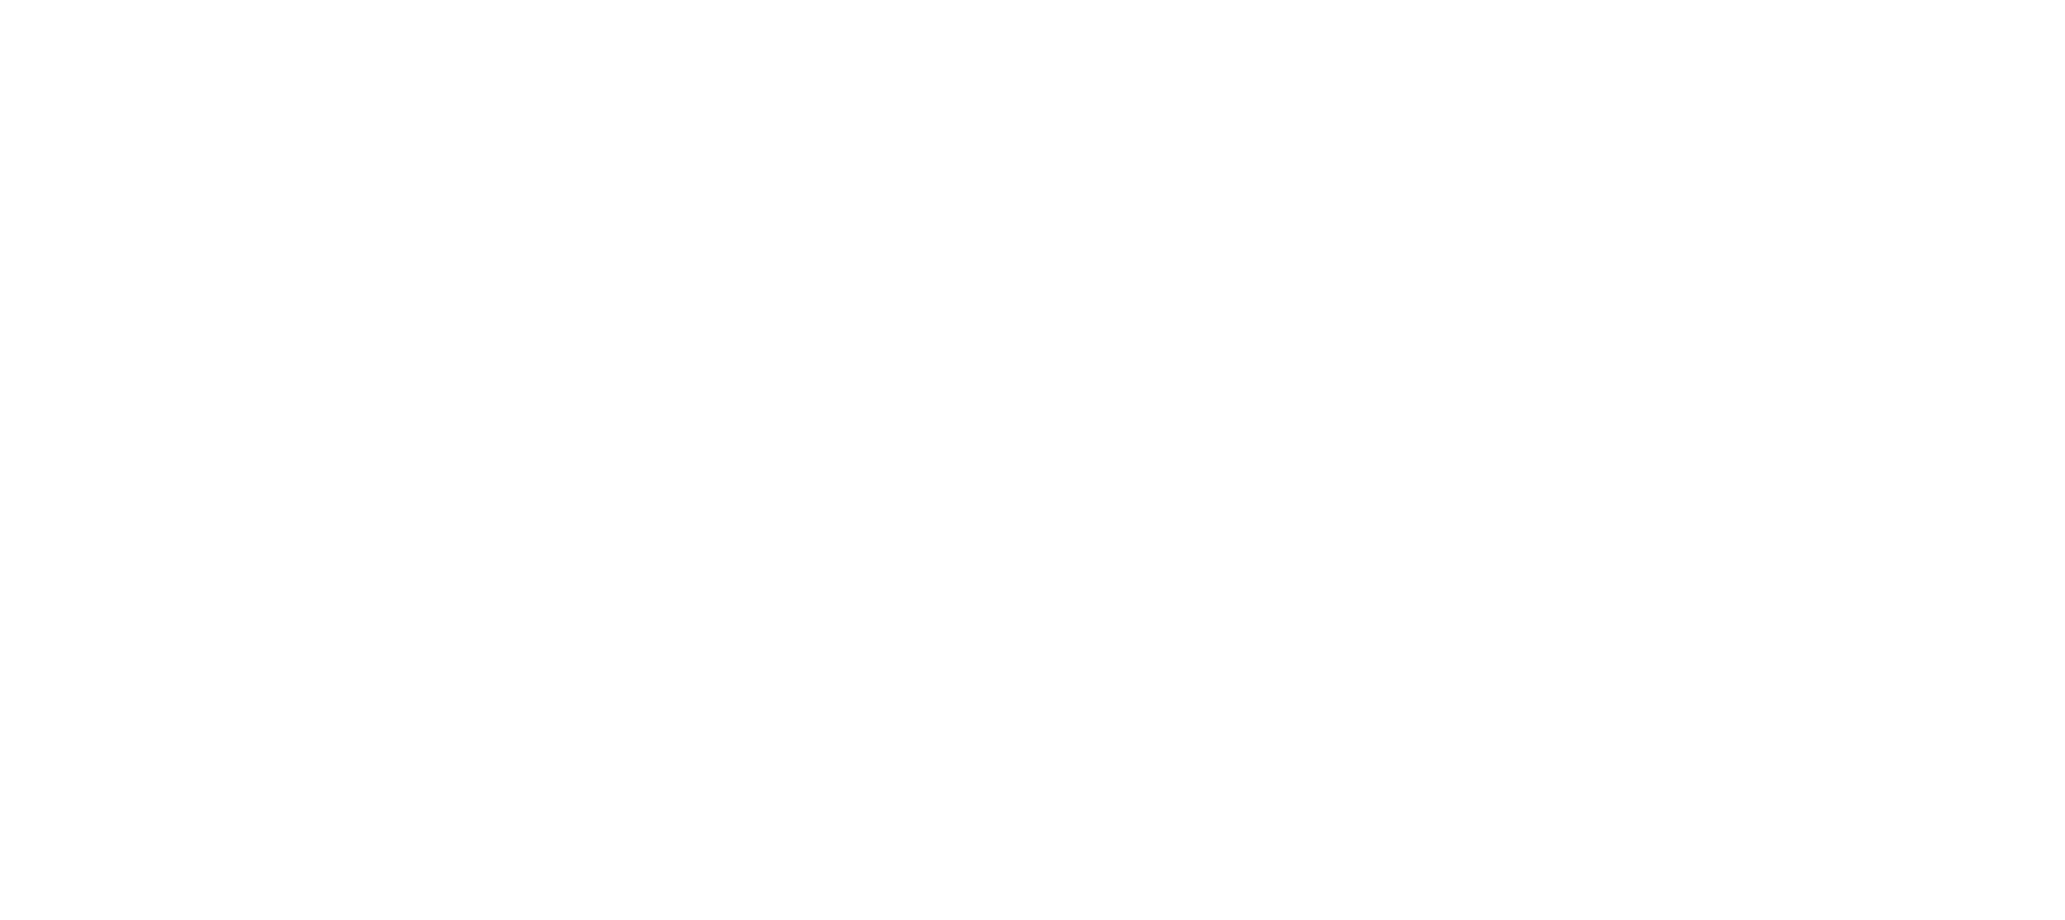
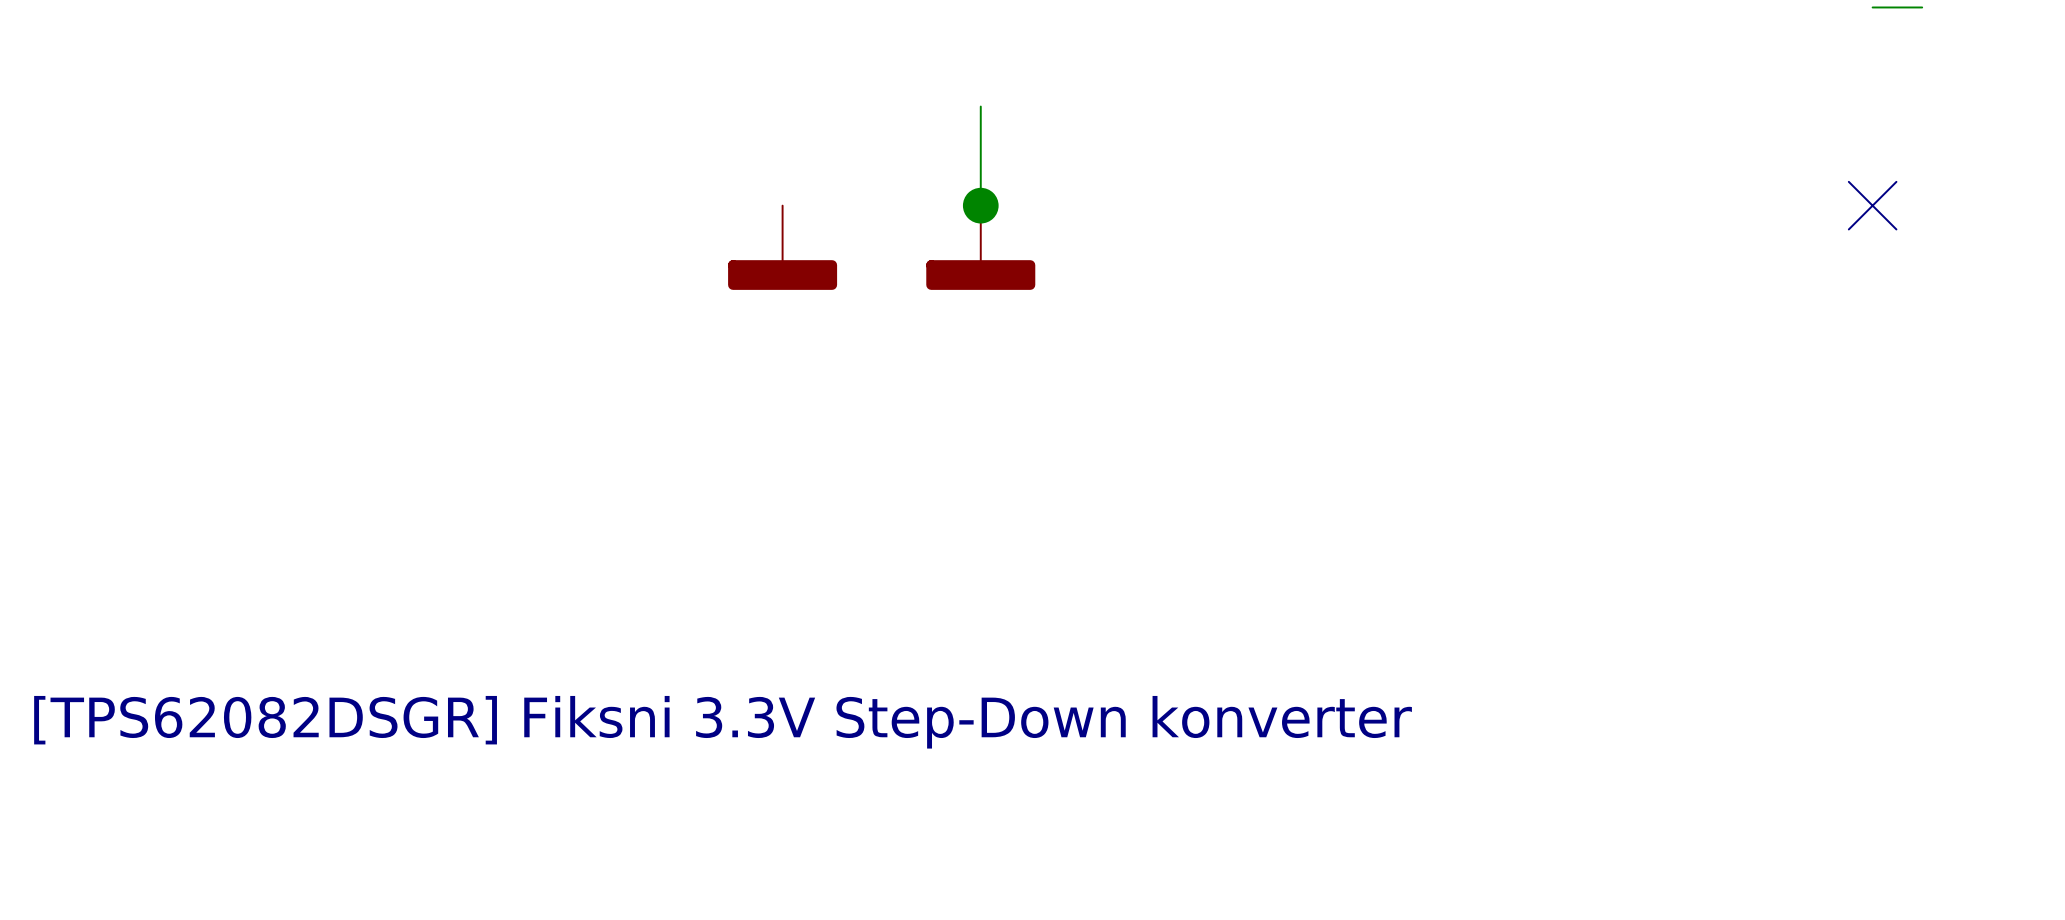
wire: none -> (1872, 7) (1922, 7)
wire: none -> (980, 106) (980, 205)
junction: none -> (980, 205)
no-connect mark: none -> (1872, 205)
power symbol: none -> (782, 247)
power symbol: none -> (980, 247)
text: none -> [TPS62082DSGR] Fiksni 3.3V Step-Down konverter (723, 722)

